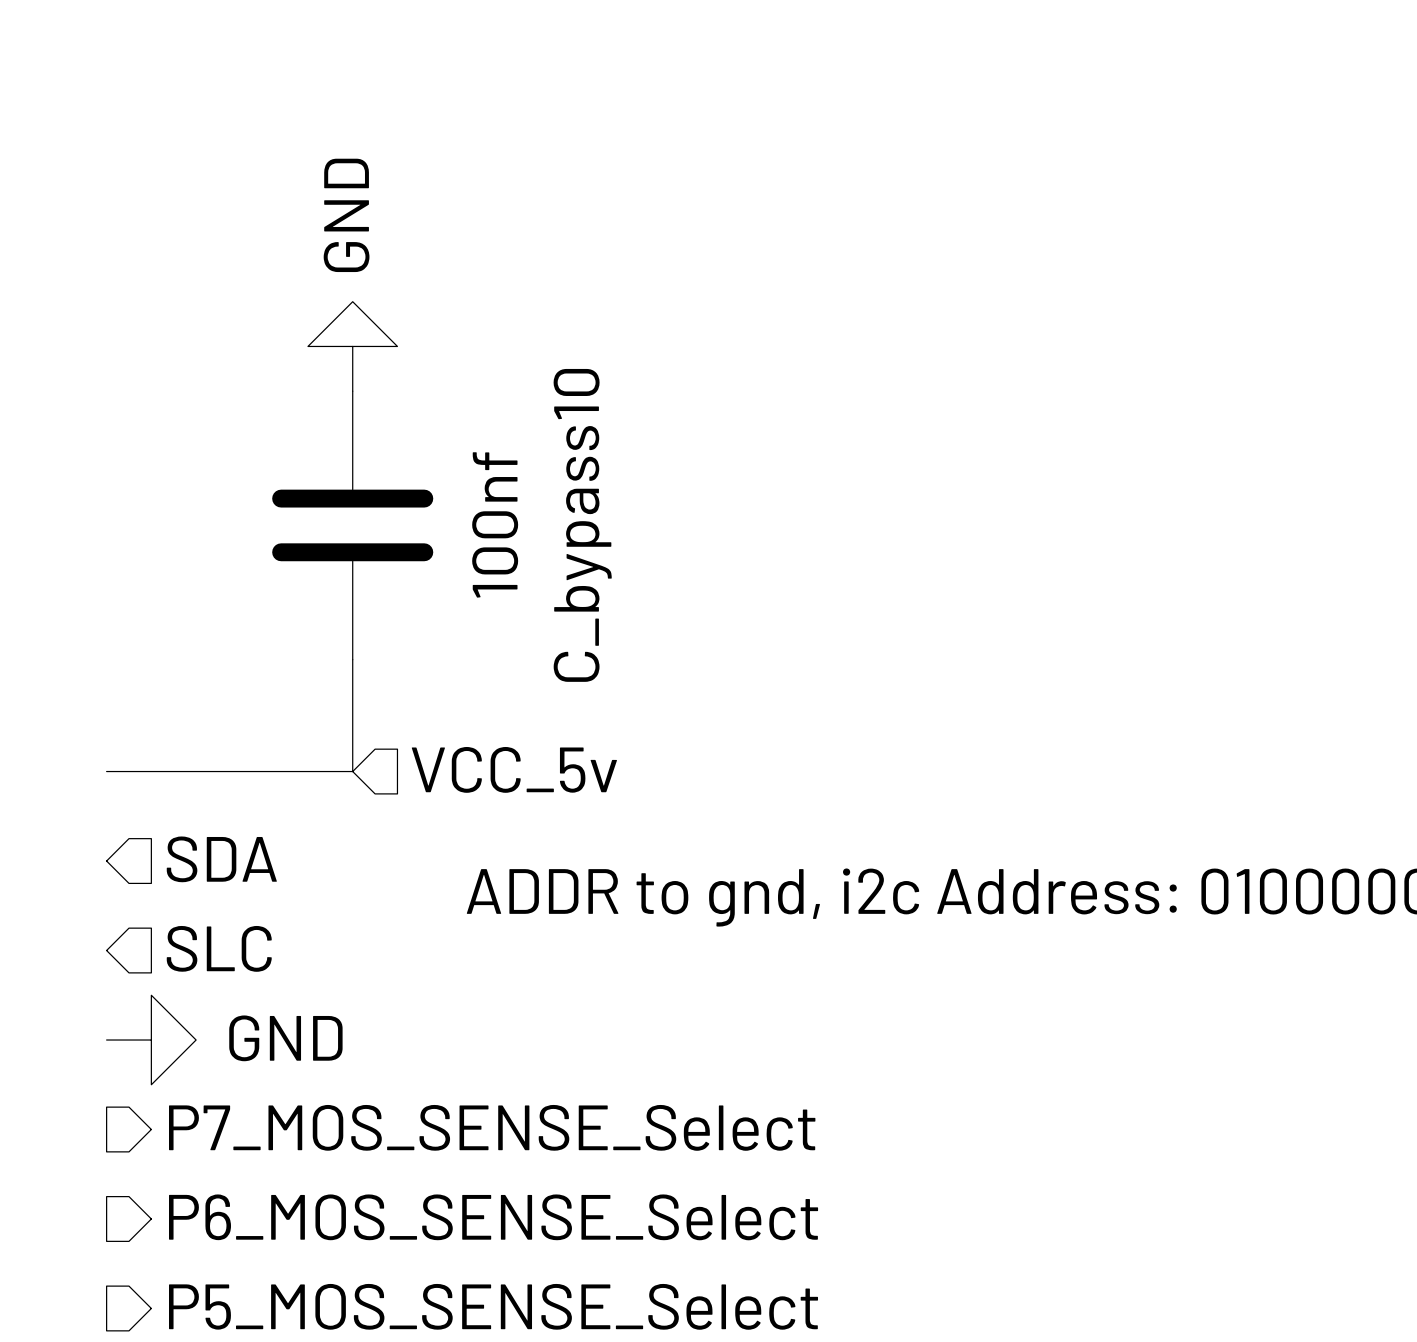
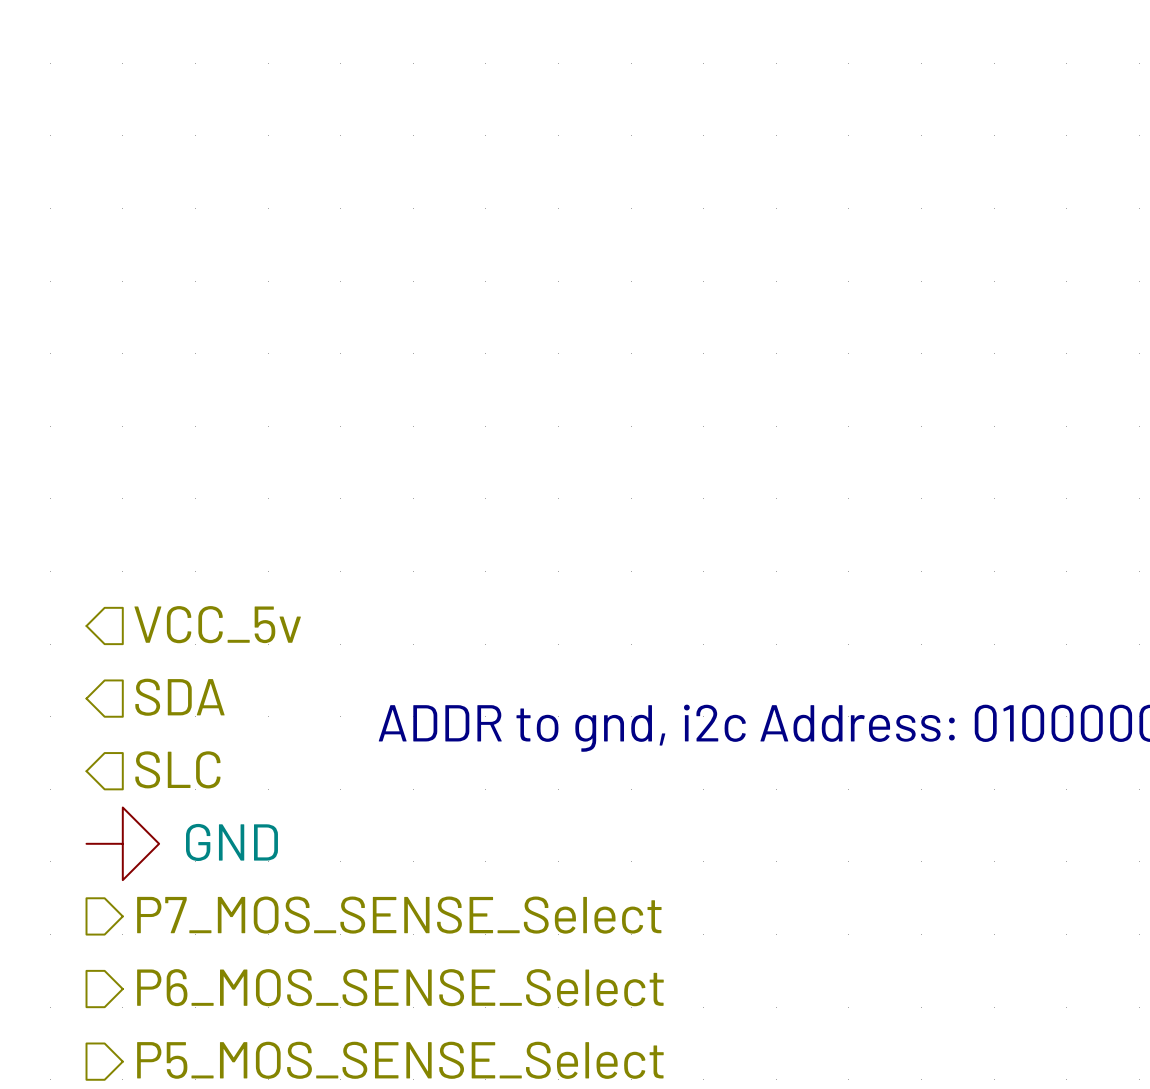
power symbol: GND (352, 346) -> none
C_bypass10: 100nf (352, 525) -> none
wire: (352, 659) (352, 771) (106, 771) -> none
hierarchical label position: VCC_5v (514, 769) -> VCC_5v (217, 624)

